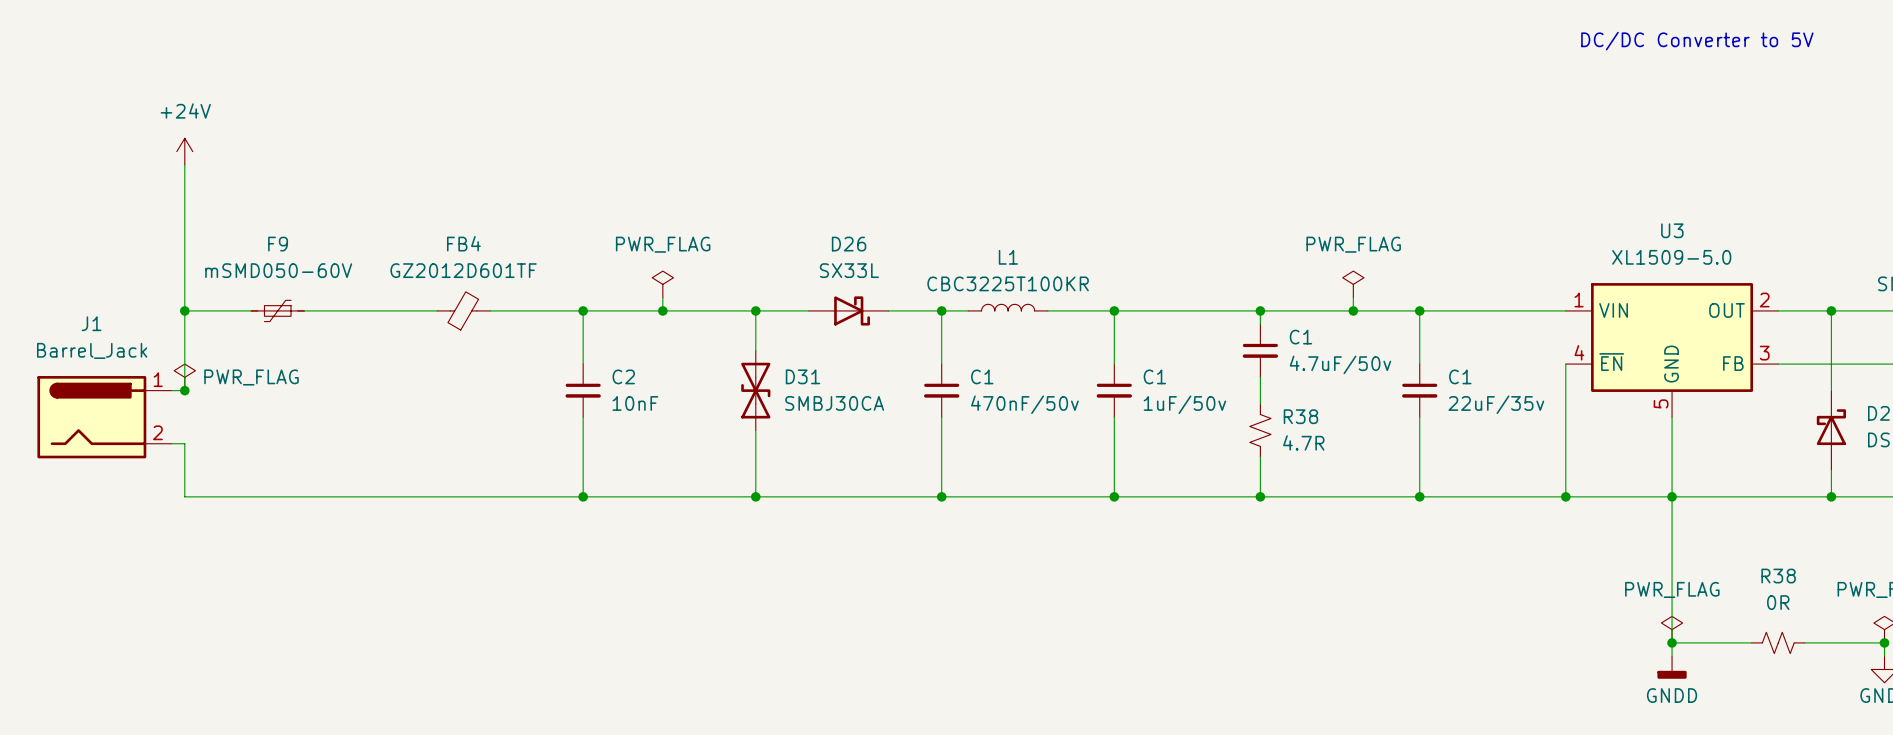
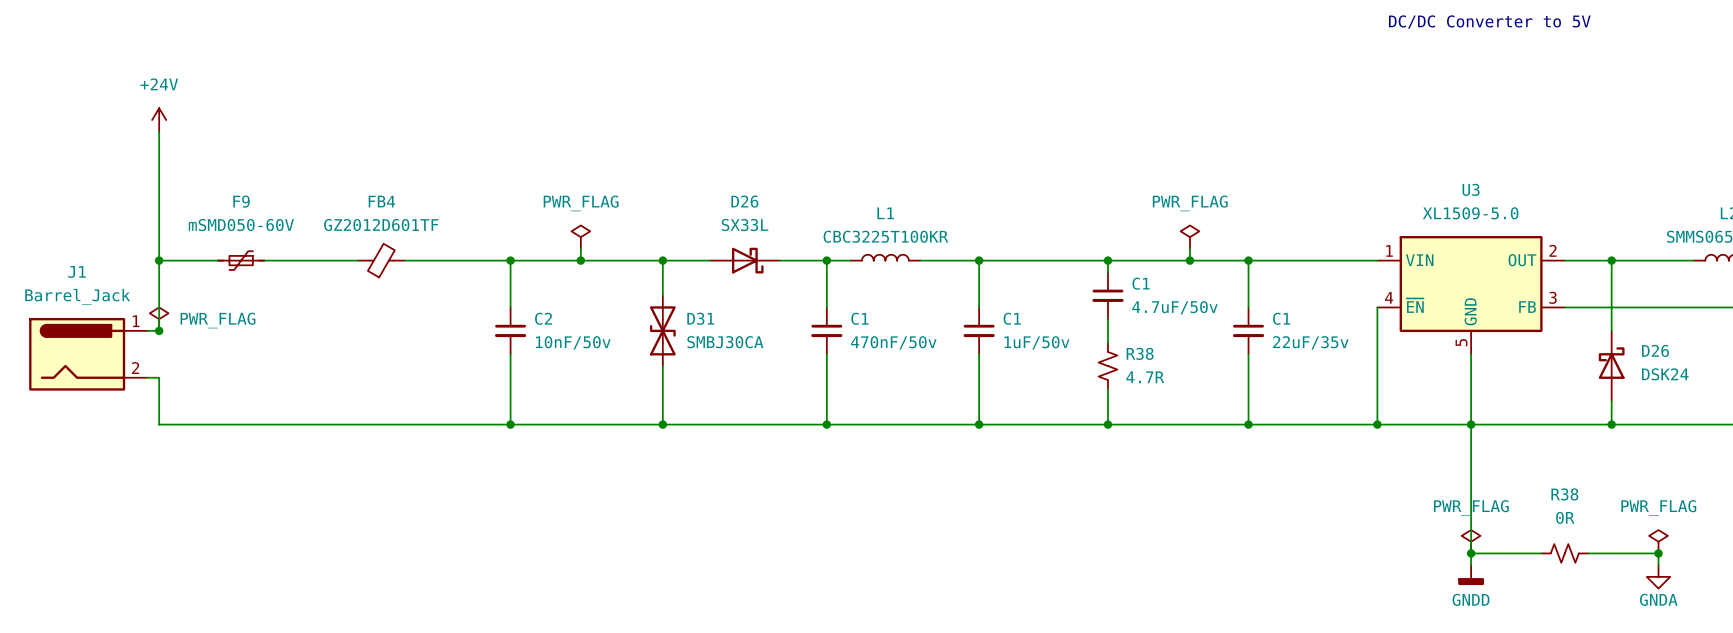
FB4 position: (463, 310) -> (381, 260)
C2 value: 10nF (635, 403) -> 10nF/50v (573, 342)

